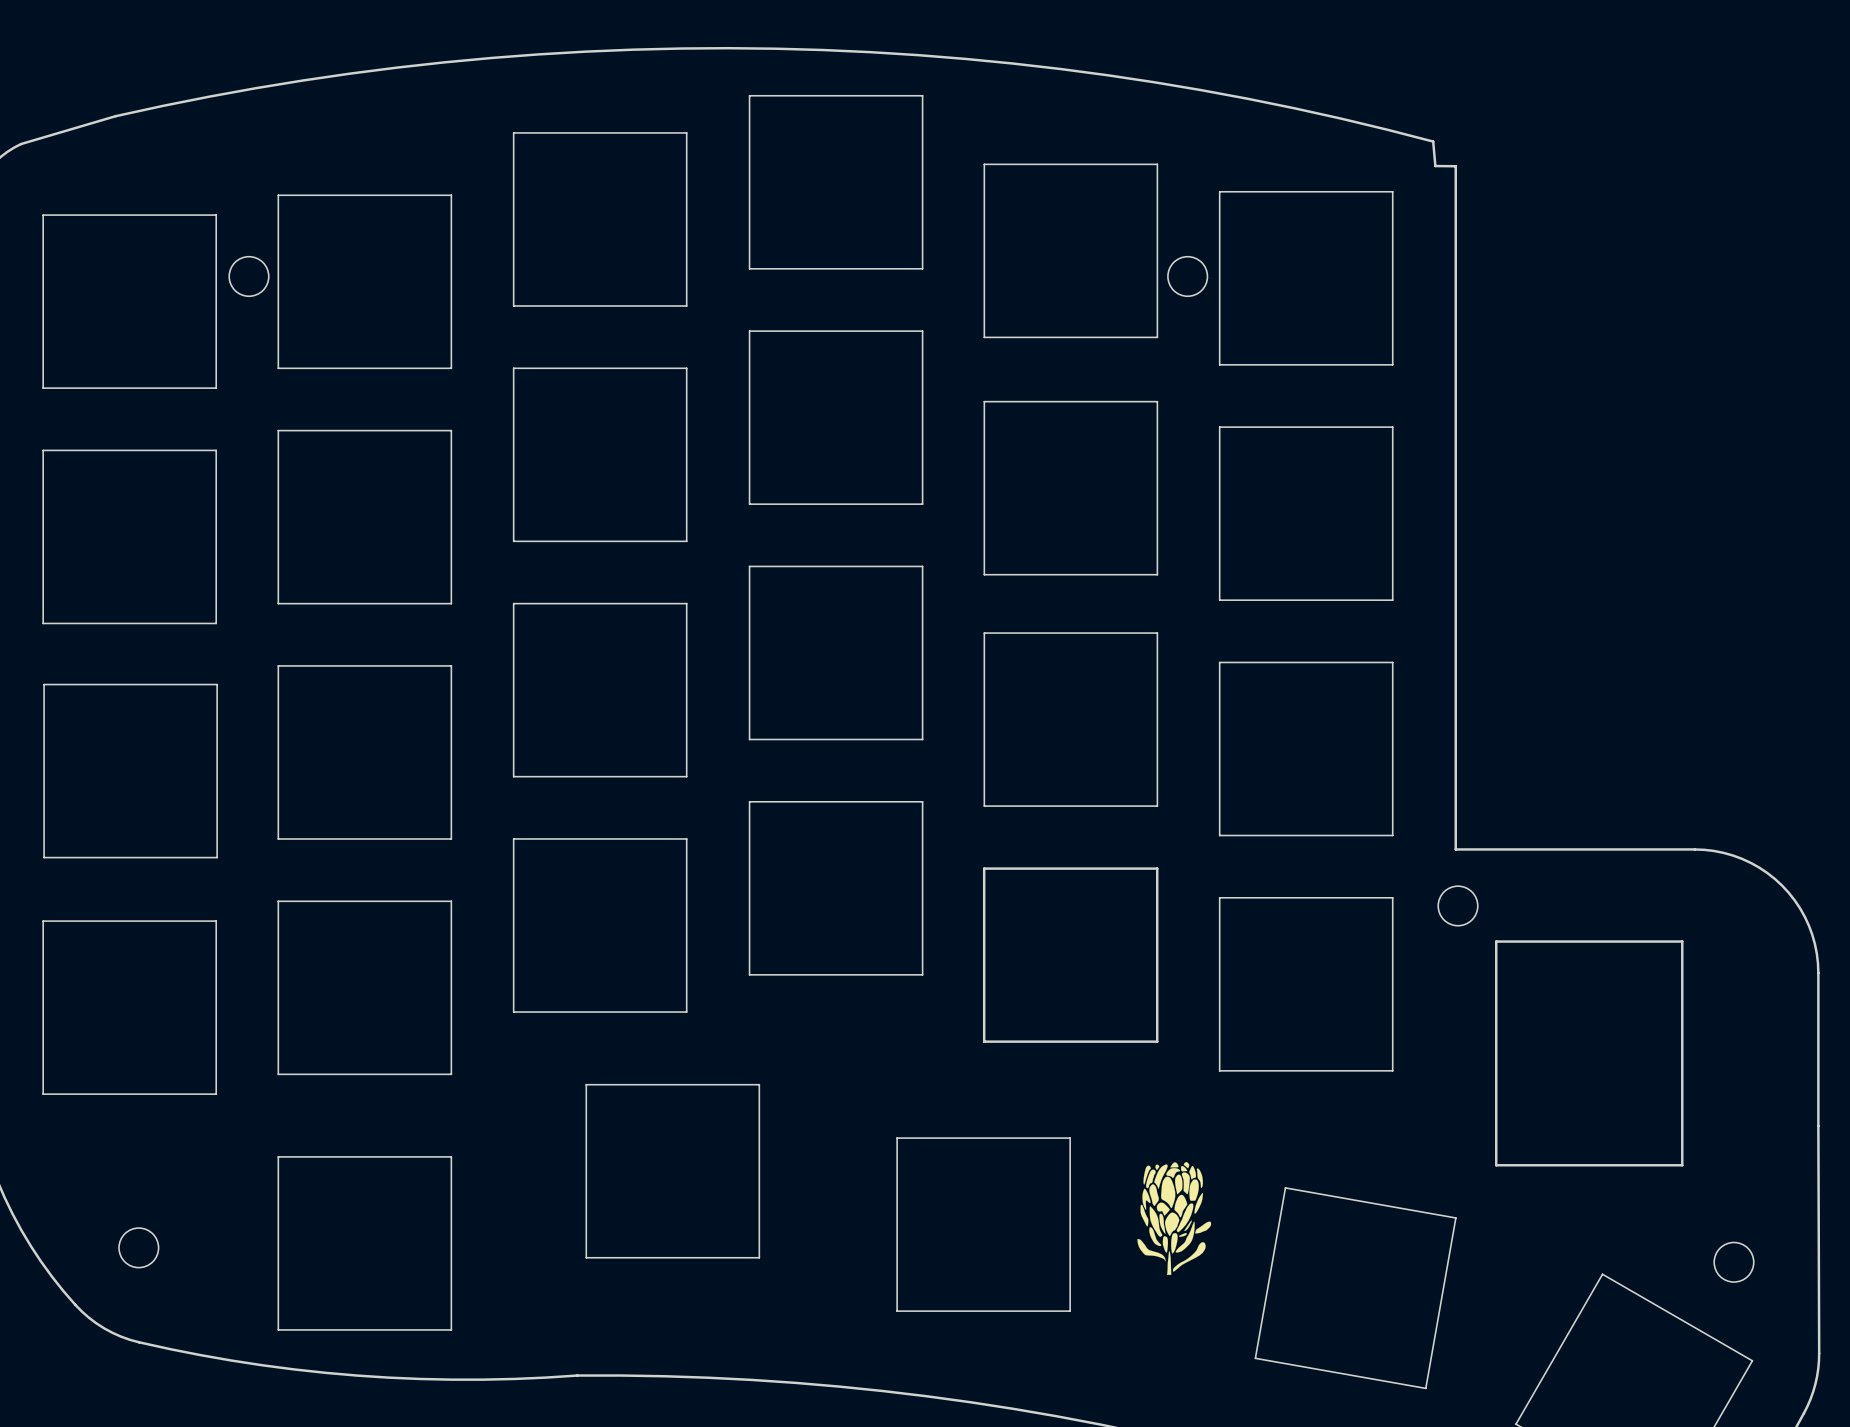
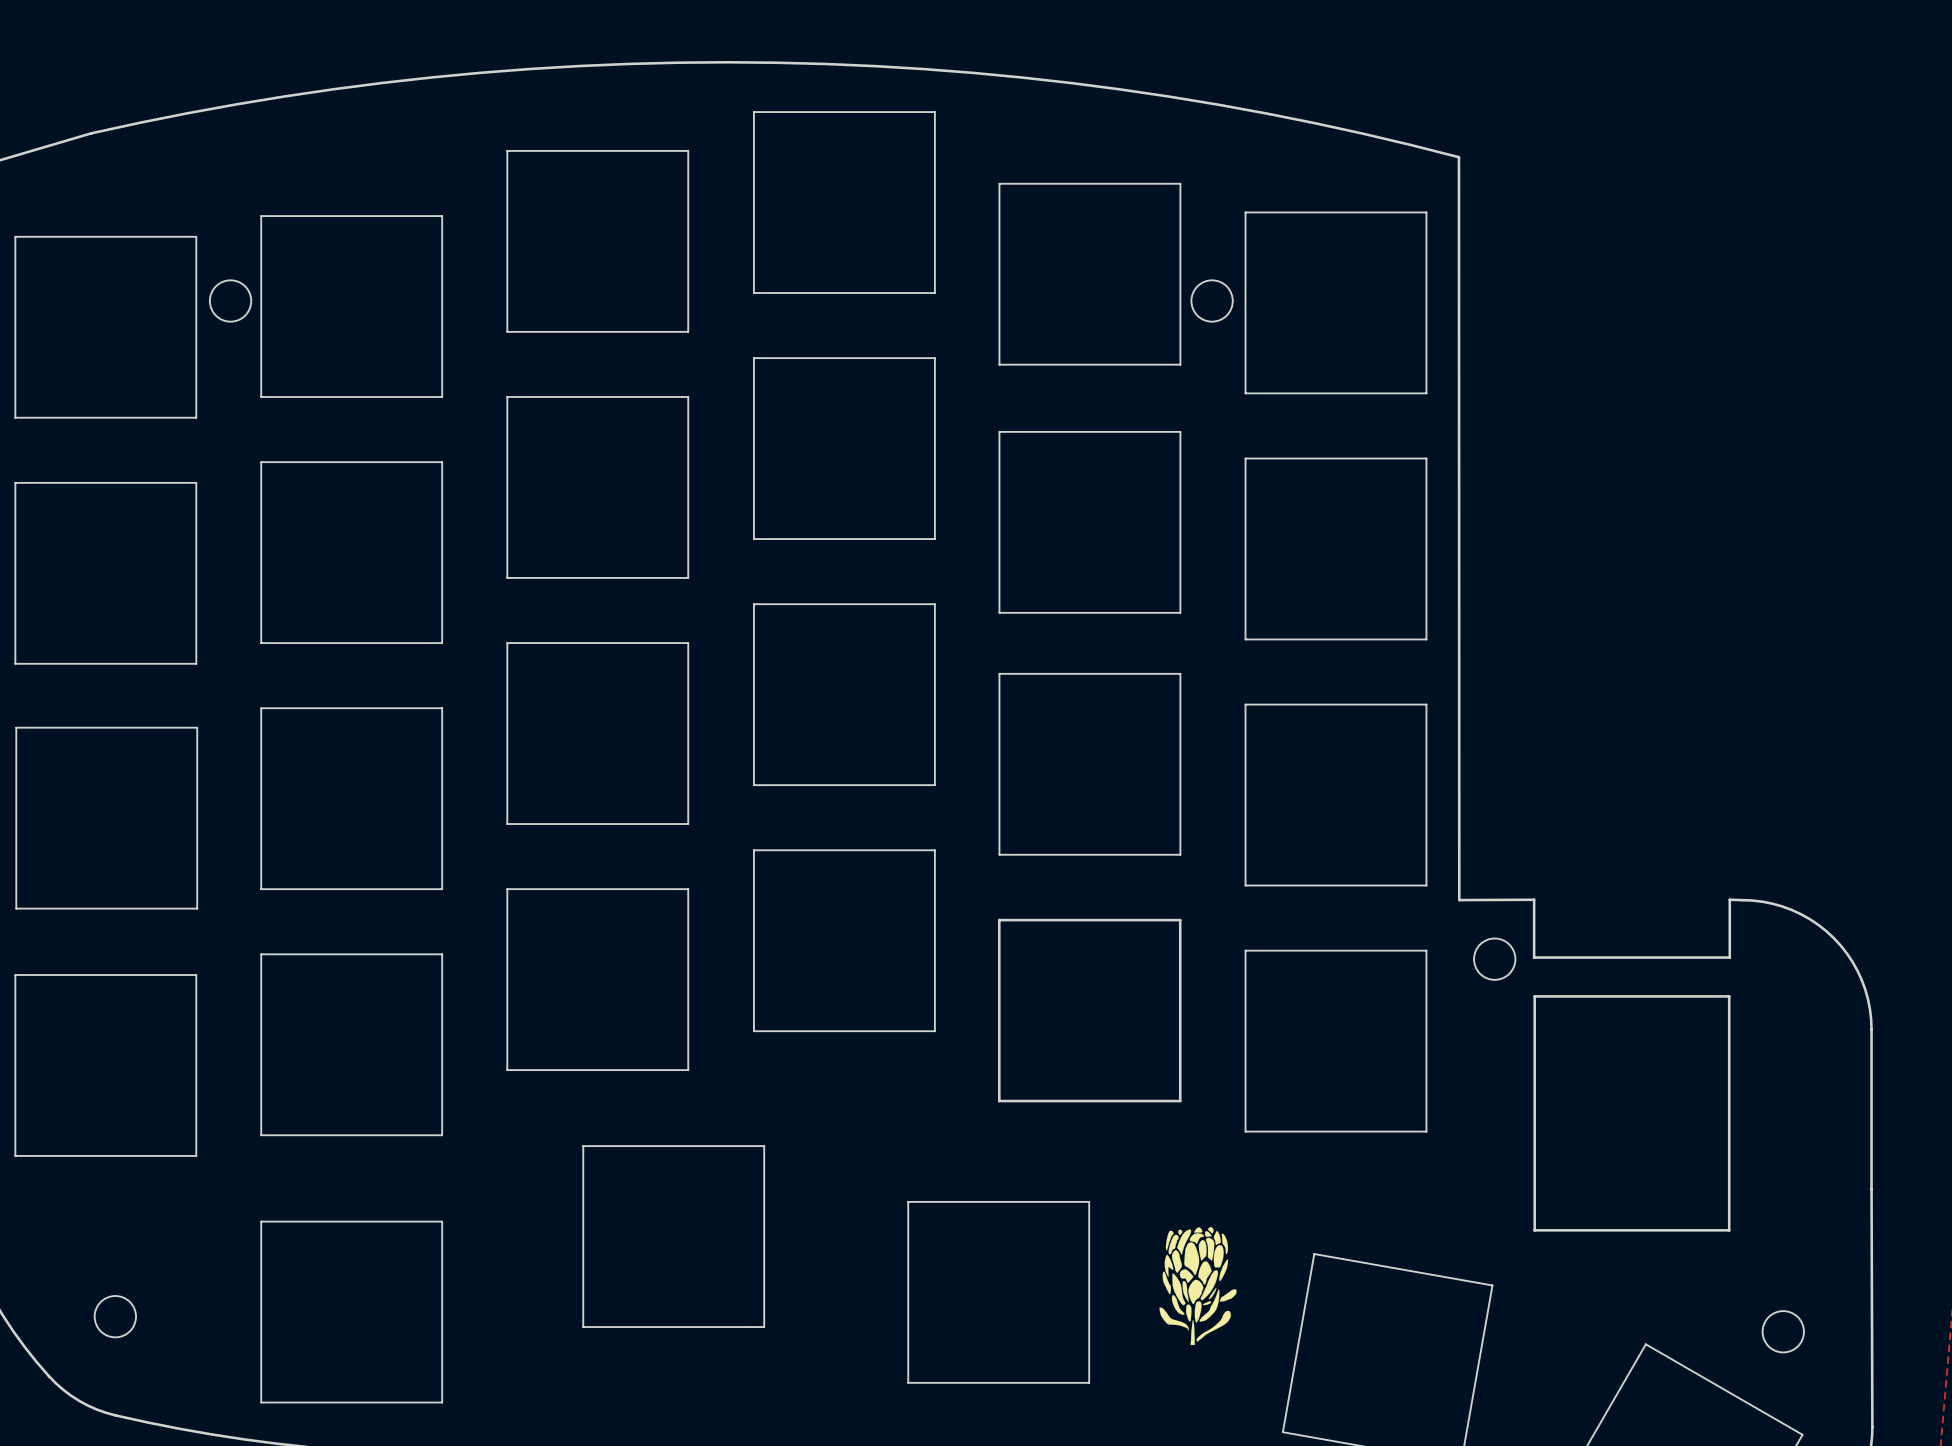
board edge: (115, 116) (255, 88) (349, 73) (443, 62) (586, 51) (681, 48) (776, 48) (918, 55) (1013, 63) (1107, 75) (1248, 98) (1340, 118) (1433, 141) (1435, 166) (1455, 166) (1455, 849) (1694, 849) -> (91, 133) (187, 113) (285, 96) (431, 77) (530, 68) (628, 63) (776, 62) (924, 69) (1022, 77) (1120, 89) (1218, 104) (1314, 123) (1458, 157) (1459, 900) (1534, 899) (1534, 957) (1729, 957) (1729, 899) (1742, 900)

